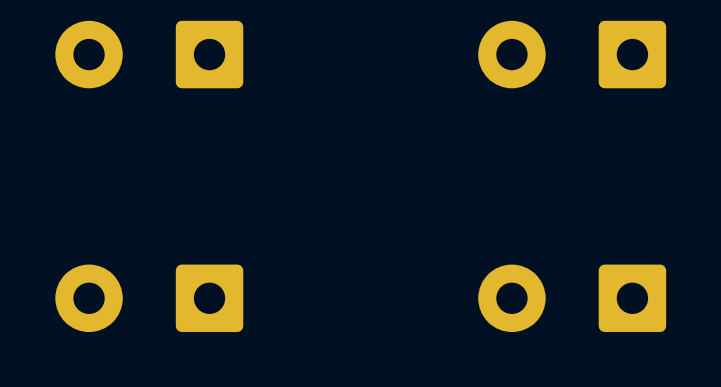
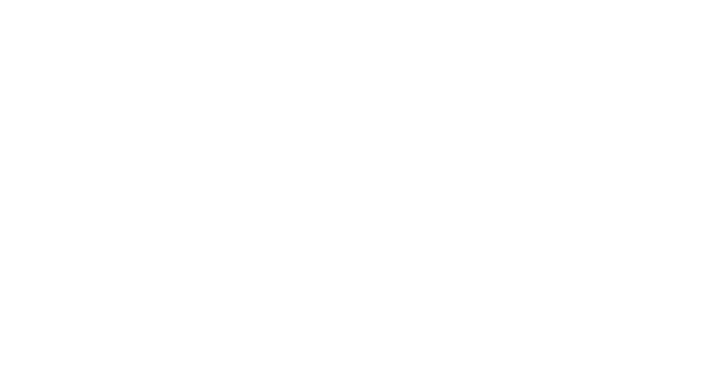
part: (149, 54) -> none
part: (572, 54) -> none
part: (149, 298) -> none
part: (572, 298) -> none

